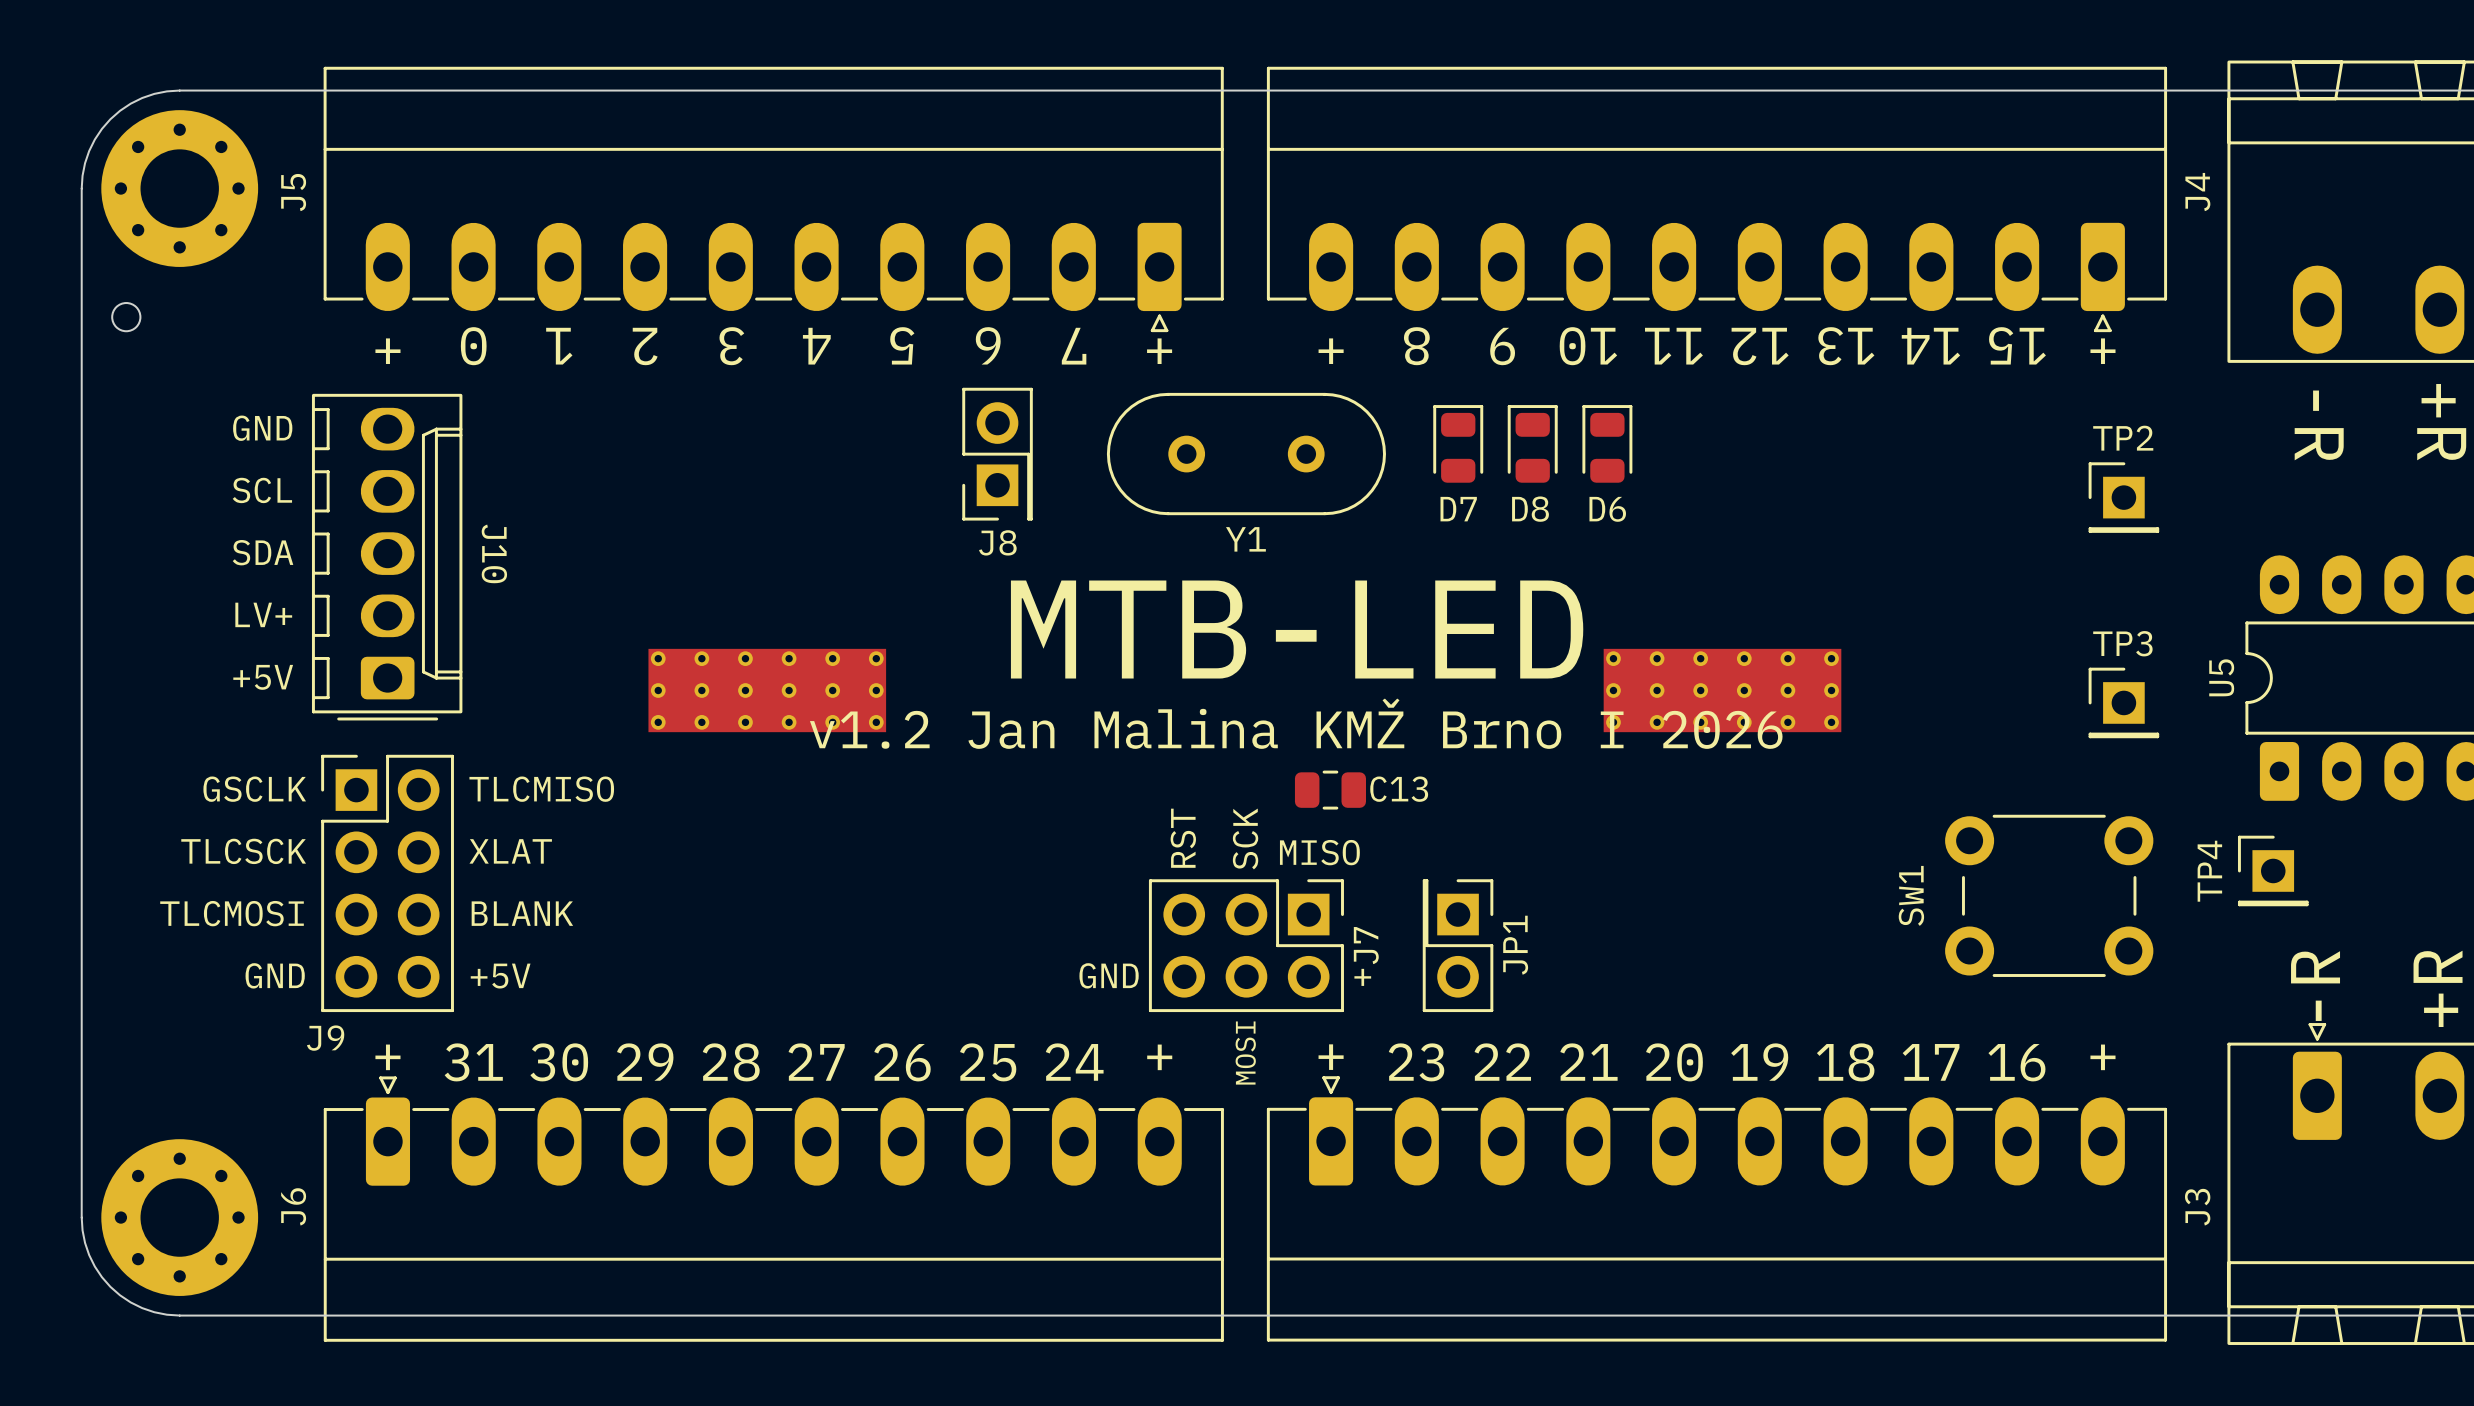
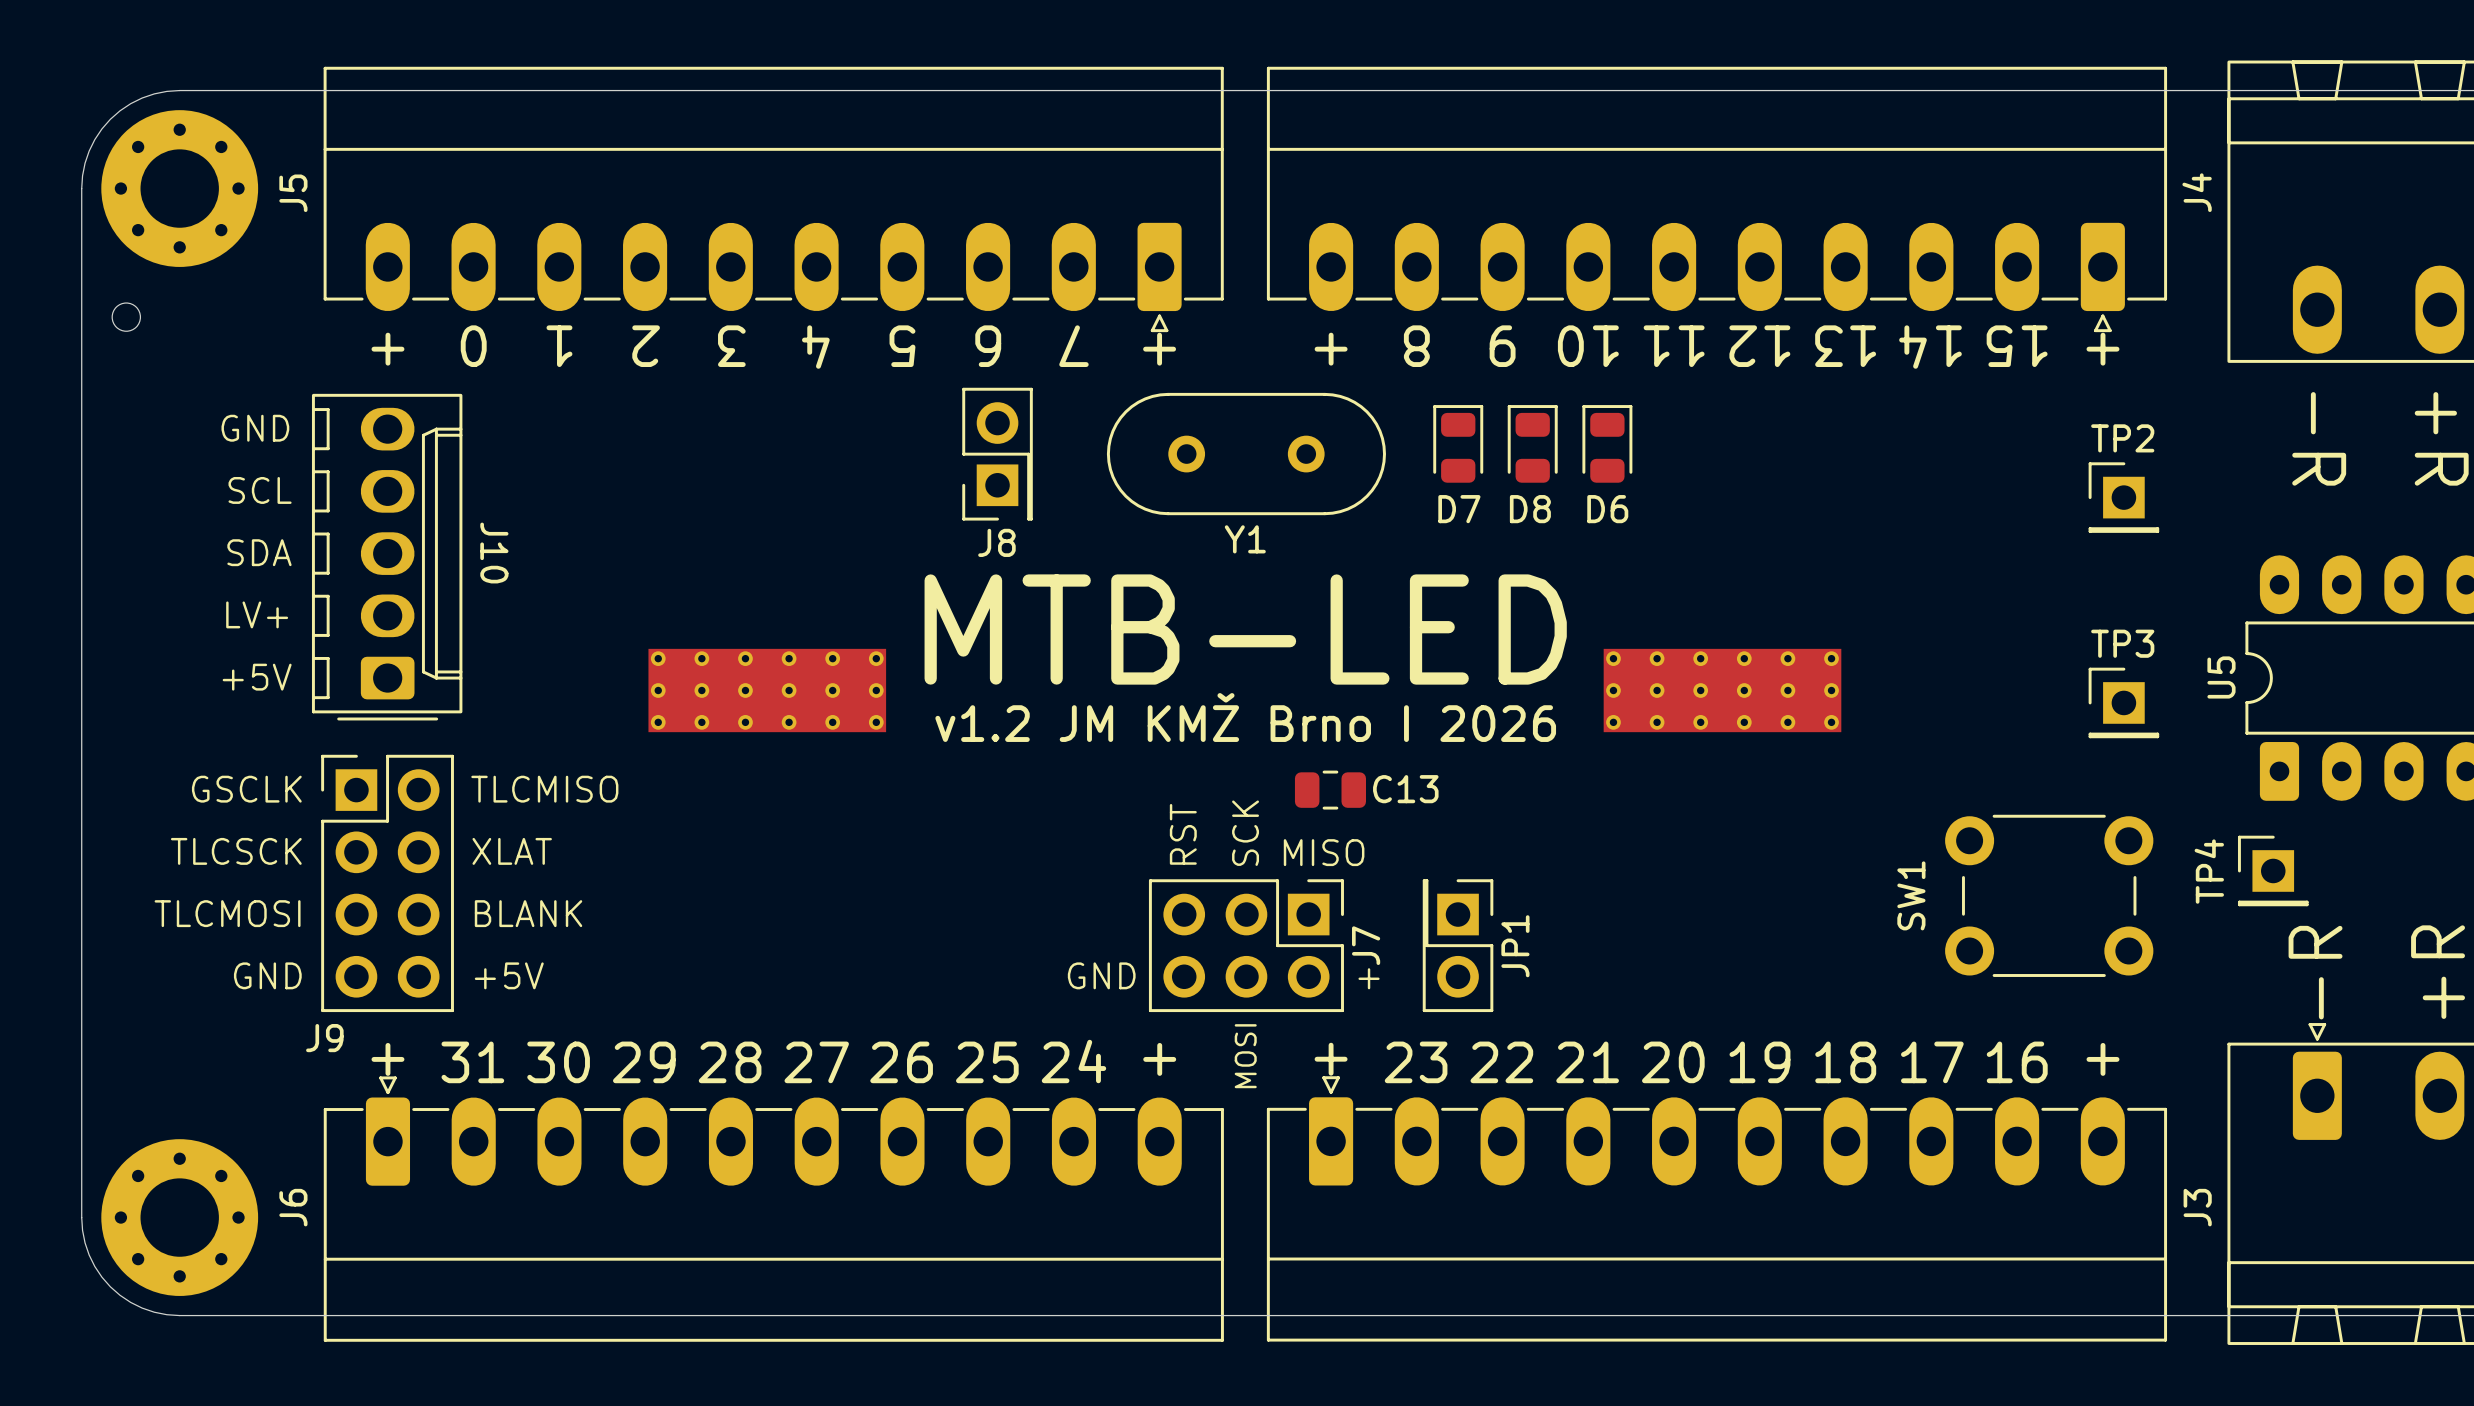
text position: MTB-LED (1297, 629) -> MTB-LED (1245, 629)
text: v1.2 Jan Malina KMŽ Brno I 2026 (1296, 723) -> v1.2 JM KMŽ Brno I 2026 (1245, 717)

